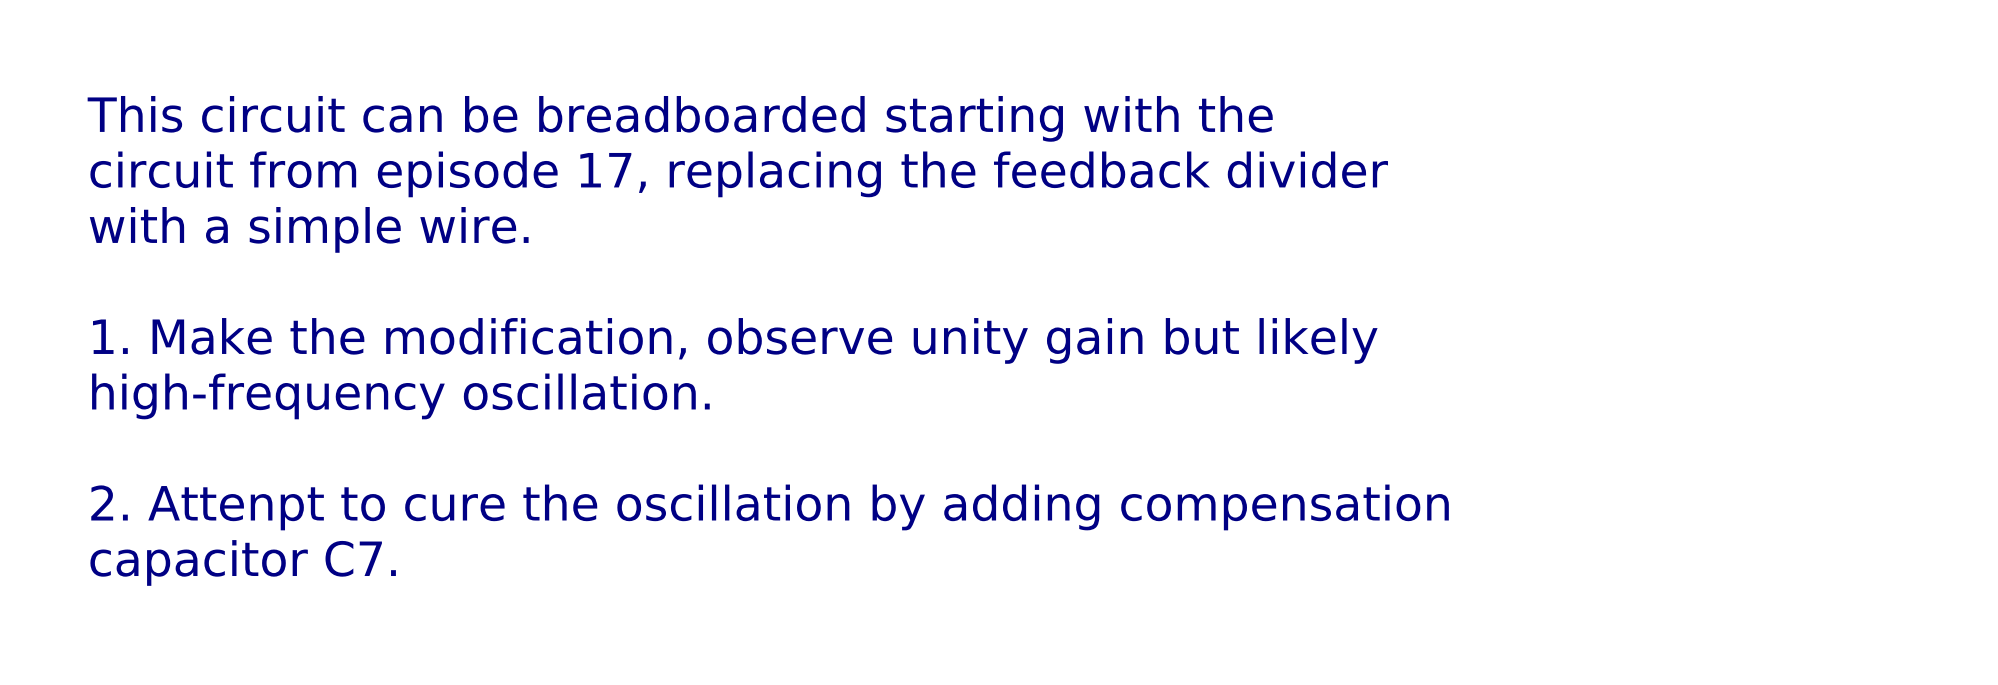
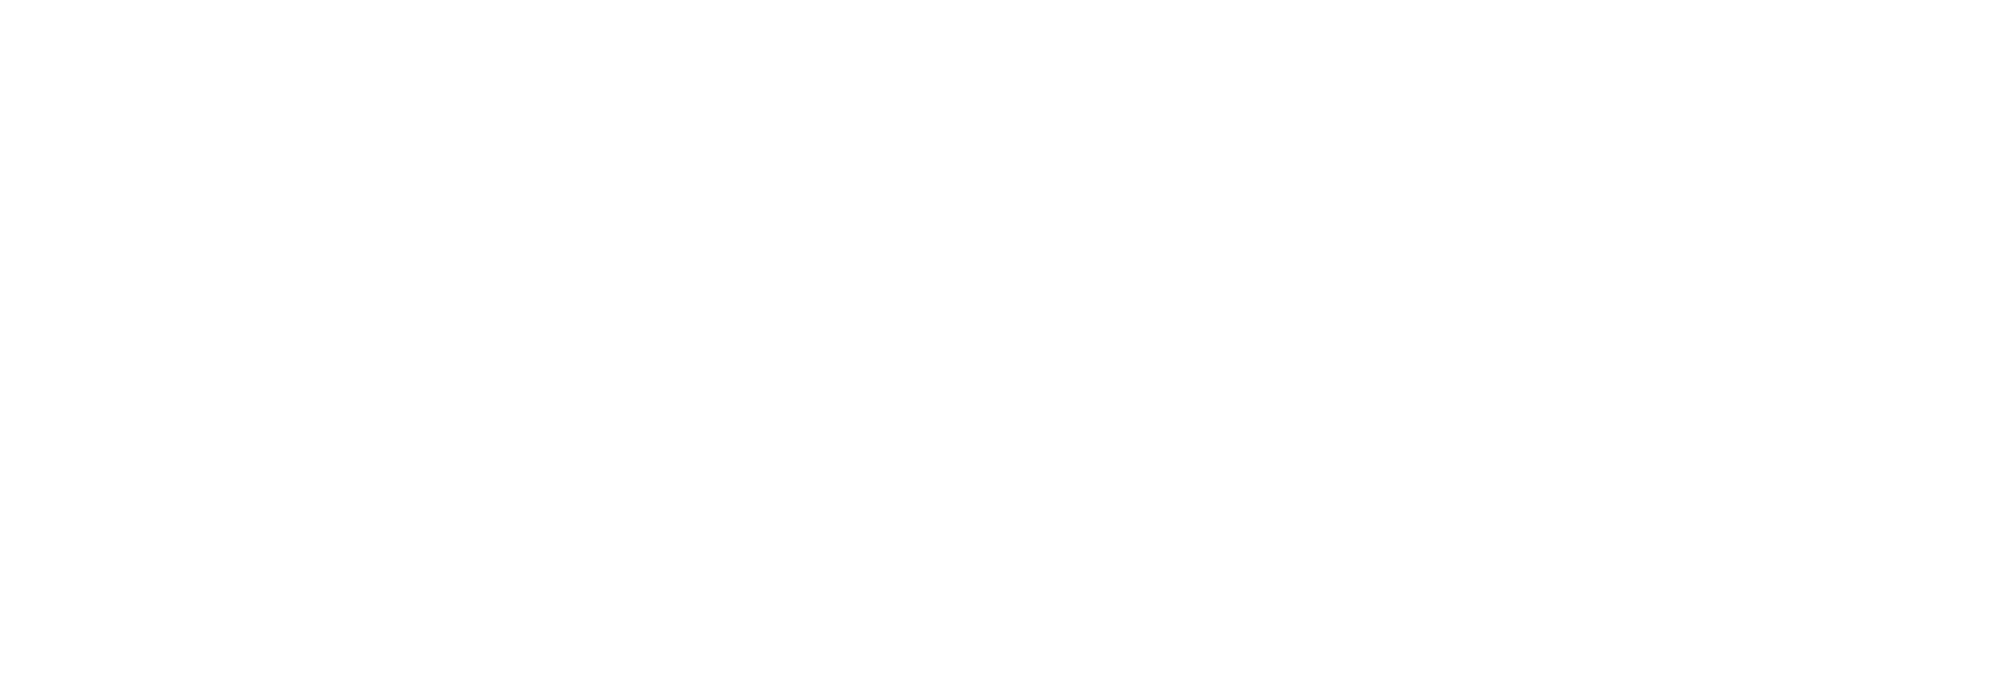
text: This circuit can be breadboarded starting with the (680, 118) -> none
text: circuit from episode 17, replacing the feedback divider (739, 174) -> none
text: with a simple wire. (309, 229) -> none
text: 1. Make the modification, observe unity gain but likely (735, 340) -> none
text: high-frequency oscillation. (400, 396) -> none
text: 2. Attenpt to cure the oscillation by adding compensation (770, 507) -> none
text: capacitor C7. (243, 562) -> none

